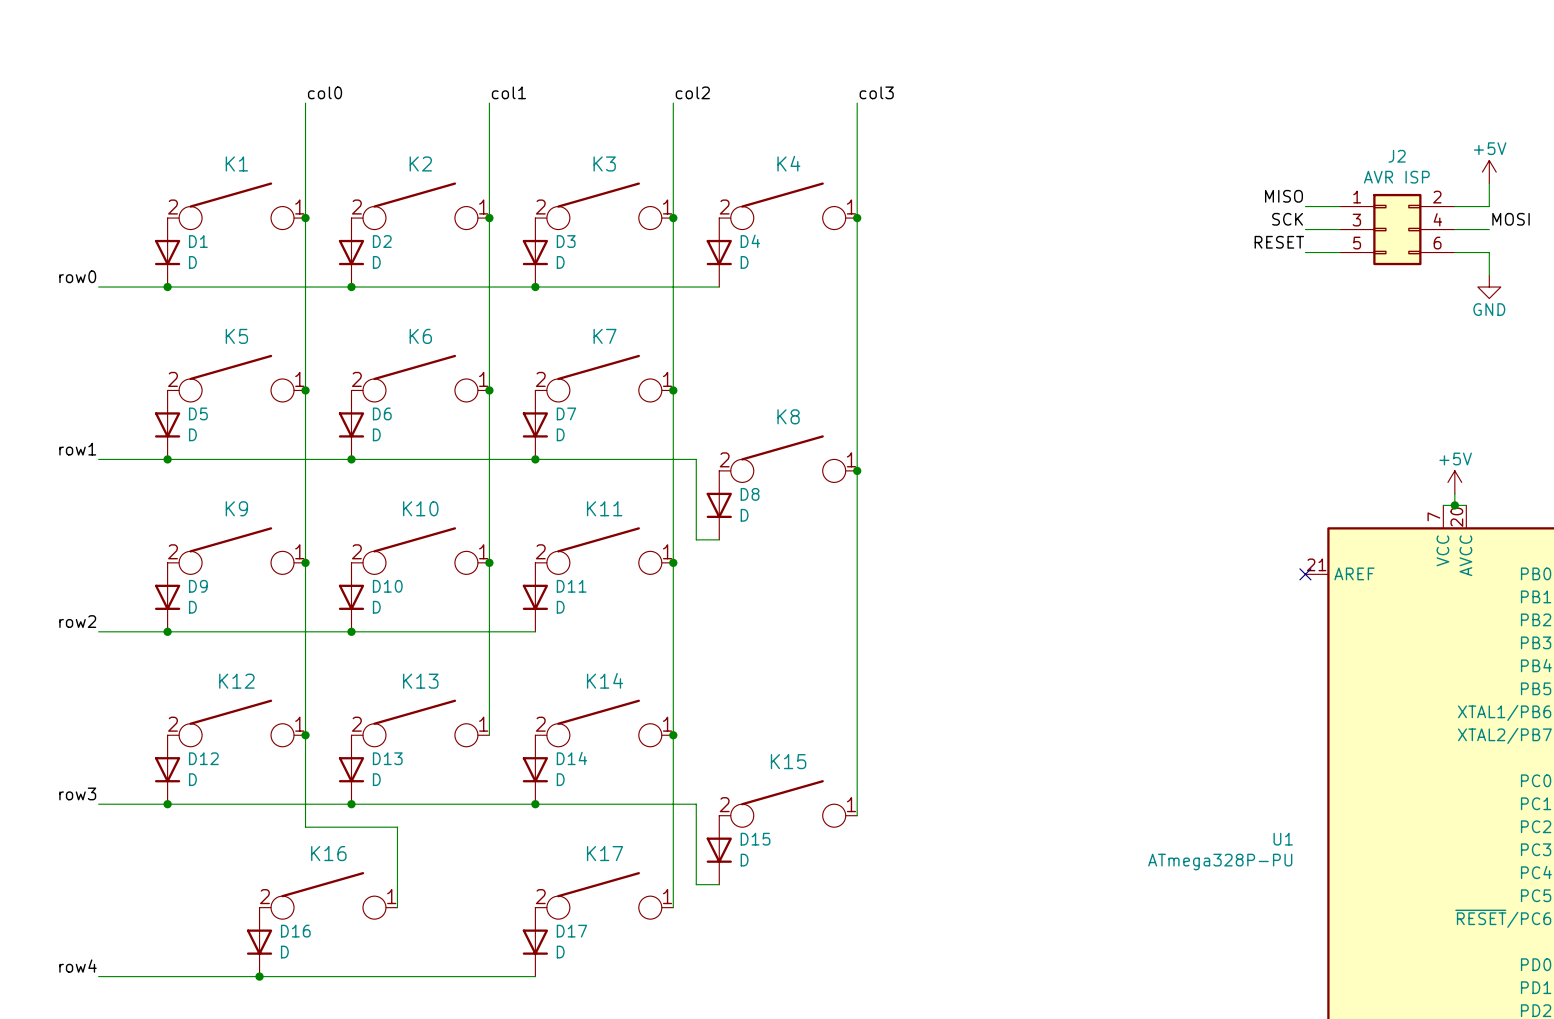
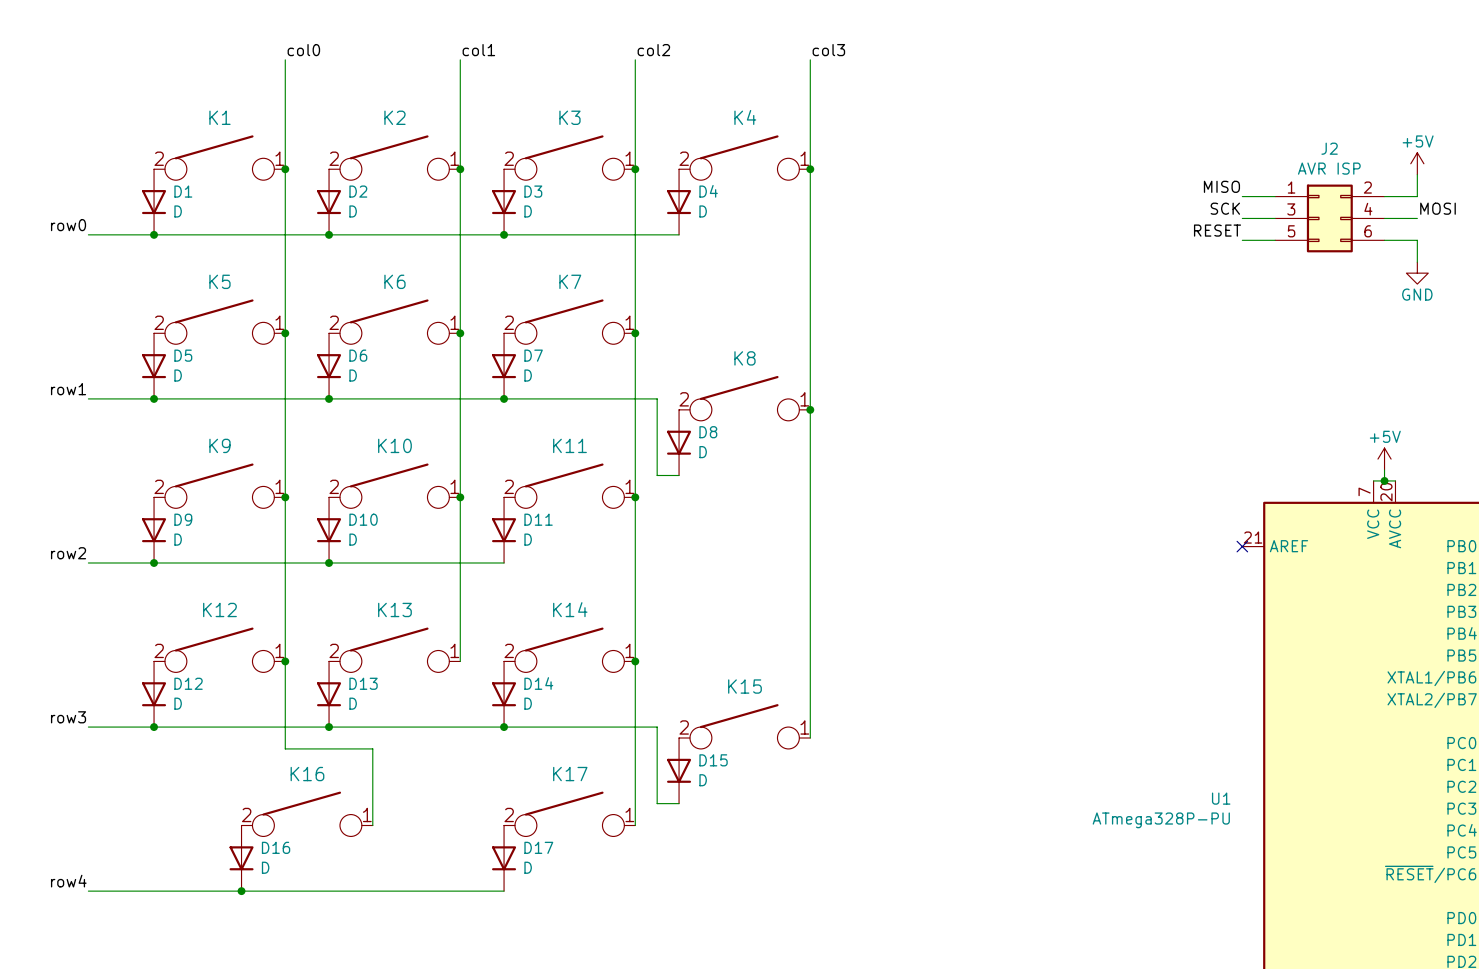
label position: col0 (325, 92) -> col0 (303, 50)
label position: col1 (508, 92) -> col1 (478, 50)
label position: col2 (692, 92) -> col2 (653, 50)
label position: col3 (876, 92) -> col3 (828, 50)
wire: (305, 103) (305, 827) (397, 827) (397, 907) -> (285, 59) (285, 748) (372, 748) (372, 825)
wire: (489, 103) (489, 735) -> (460, 59) (460, 661)
wire: (673, 103) (673, 907) -> (635, 59) (635, 825)
wire: (857, 103) (857, 815) -> (810, 59) (810, 738)
junction: none -> (285, 169)
junction: none -> (460, 169)
K1 position: (236, 205) -> (219, 157)
K2 position: (420, 205) -> (394, 157)
K3 position: (604, 205) -> (569, 157)
K4 position: (788, 205) -> (744, 157)
junction: (305, 218) -> none
junction: (489, 218) -> none
junction position: (673, 218) -> (635, 169)
junction position: (857, 218) -> (810, 169)
junction: none -> (329, 234)
junction: none -> (504, 234)
D1 position: (167, 252) -> (154, 202)
D2 position: (351, 252) -> (329, 202)
D3 position: (535, 252) -> (504, 202)
D4 position: (719, 252) -> (679, 202)
label position: row0 (77, 276) -> row0 (68, 225)
wire: (98, 287) (719, 287) -> (88, 234) (679, 234)
junction position: (167, 287) -> (154, 234)
junction: (351, 287) -> none
junction: (535, 287) -> none
junction: none -> (285, 333)
junction: none -> (460, 333)
K5 position: (236, 378) -> (219, 321)
K6 position: (420, 378) -> (394, 321)
K7 position: (604, 378) -> (569, 321)
junction: (305, 390) -> none
junction: (489, 390) -> none
junction position: (673, 390) -> (635, 333)
junction: none -> (329, 398)
junction: none -> (504, 398)
D5 position: (167, 424) -> (154, 366)
D6 position: (351, 424) -> (329, 366)
D7 position: (535, 424) -> (504, 366)
label position: row1 (77, 449) -> row1 (68, 389)
K8 position: (788, 458) -> (744, 398)
wire: (98, 459) (696, 459) (696, 539) (719, 539) -> (88, 398) (657, 398) (657, 475) (679, 475)
junction position: (167, 459) -> (154, 398)
junction: (351, 459) -> none
junction: (535, 459) -> none
junction position: (857, 470) -> (810, 409)
D8 position: (719, 505) -> (679, 442)
junction: none -> (285, 497)
K9 position: (236, 550) -> (219, 485)
K10 position: (420, 550) -> (394, 485)
K11 position: (604, 550) -> (569, 485)
junction: (305, 562) -> none
junction position: (489, 562) -> (460, 497)
junction position: (673, 562) -> (635, 497)
junction: none -> (329, 562)
D9 position: (167, 597) -> (154, 530)
D10 position: (351, 597) -> (329, 530)
D11 position: (535, 597) -> (504, 530)
label position: row2 (77, 621) -> row2 (68, 553)
wire: (98, 631) (535, 631) -> (88, 562) (504, 562)
junction position: (167, 631) -> (154, 562)
junction: (351, 631) -> none
junction: none -> (285, 661)
K12 position: (236, 723) -> (219, 649)
K13 position: (420, 723) -> (394, 649)
K14 position: (604, 723) -> (569, 649)
junction: (305, 735) -> none
junction position: (673, 735) -> (635, 661)
junction: none -> (329, 727)
D12 position: (167, 769) -> (154, 694)
D13 position: (351, 769) -> (329, 694)
D14 position: (535, 769) -> (504, 694)
label position: row3 (77, 793) -> row3 (68, 717)
K15 position: (788, 803) -> (744, 726)
wire: (98, 804) (696, 804) (696, 884) (719, 884) -> (88, 727) (657, 727) (657, 803) (679, 803)
junction position: (167, 804) -> (154, 727)
junction: (351, 804) -> none
junction position: (535, 804) -> (504, 727)
D15 position: (719, 850) -> (679, 770)
K16 position: (328, 895) -> (307, 814)
K17 position: (604, 895) -> (569, 814)
D16 position: (259, 942) -> (241, 858)
D17 position: (535, 942) -> (504, 858)
label position: row4 (78, 966) -> row4 (68, 881)
wire: (98, 976) (535, 976) -> (88, 891) (504, 891)
junction position: (259, 976) -> (241, 891)

